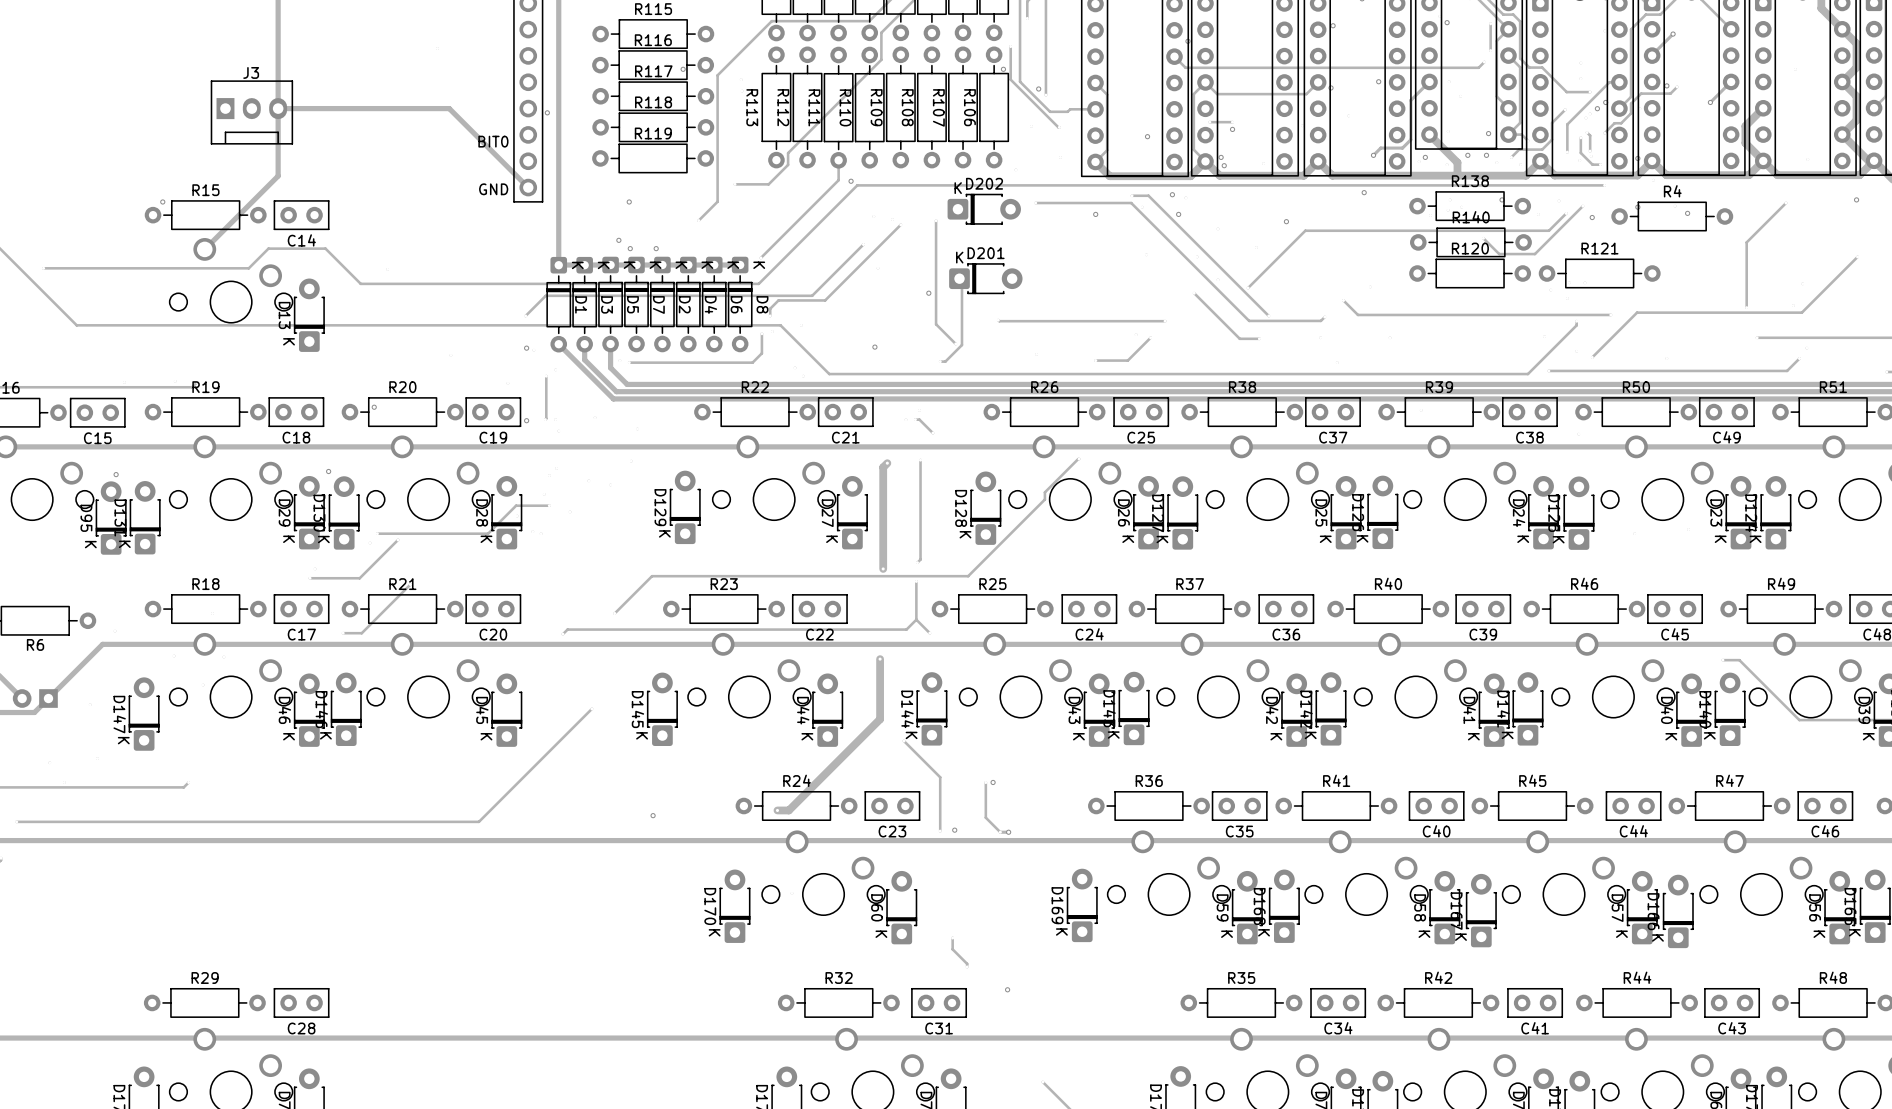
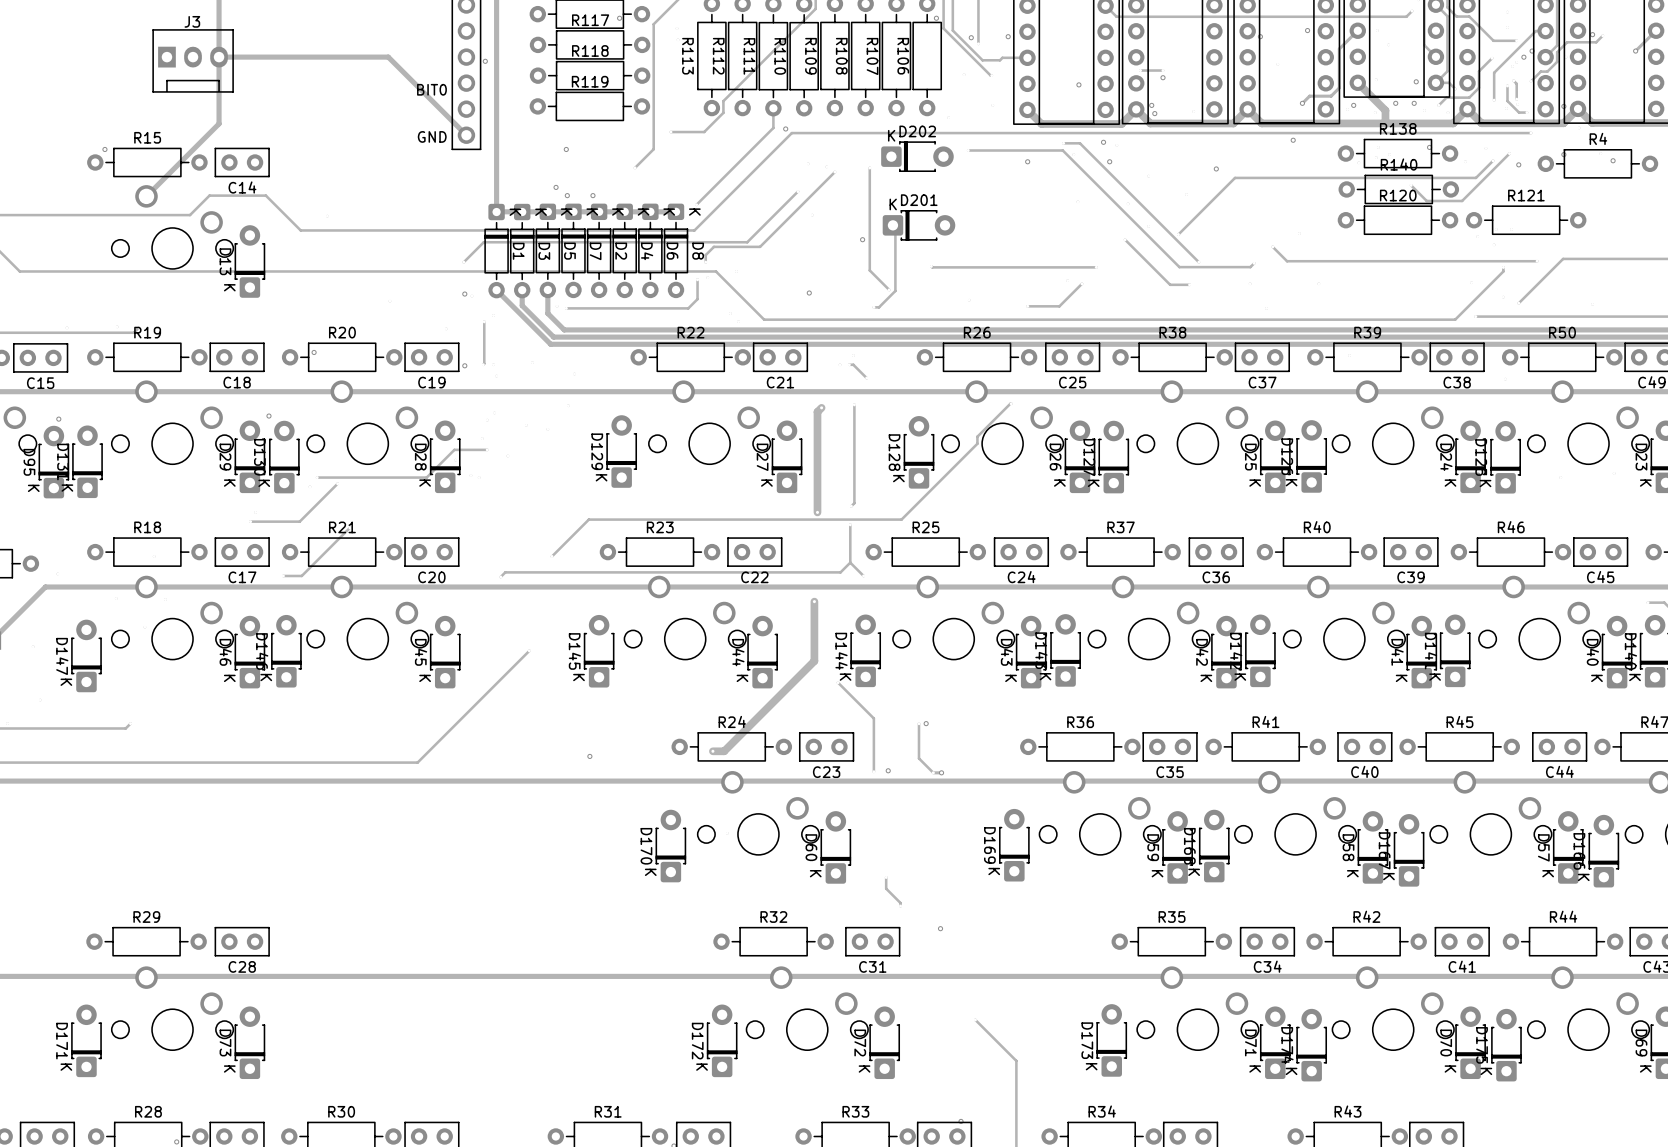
track: (1095, 82) (1107, 94) (1107, 150) (1095, 161) -> none
track: (1318, 82) (1306, 94) (1217, 94) (1205, 82) (1193, 94) (1193, 149) (1205, 161) -> none
via: none -> (1008, 36)

